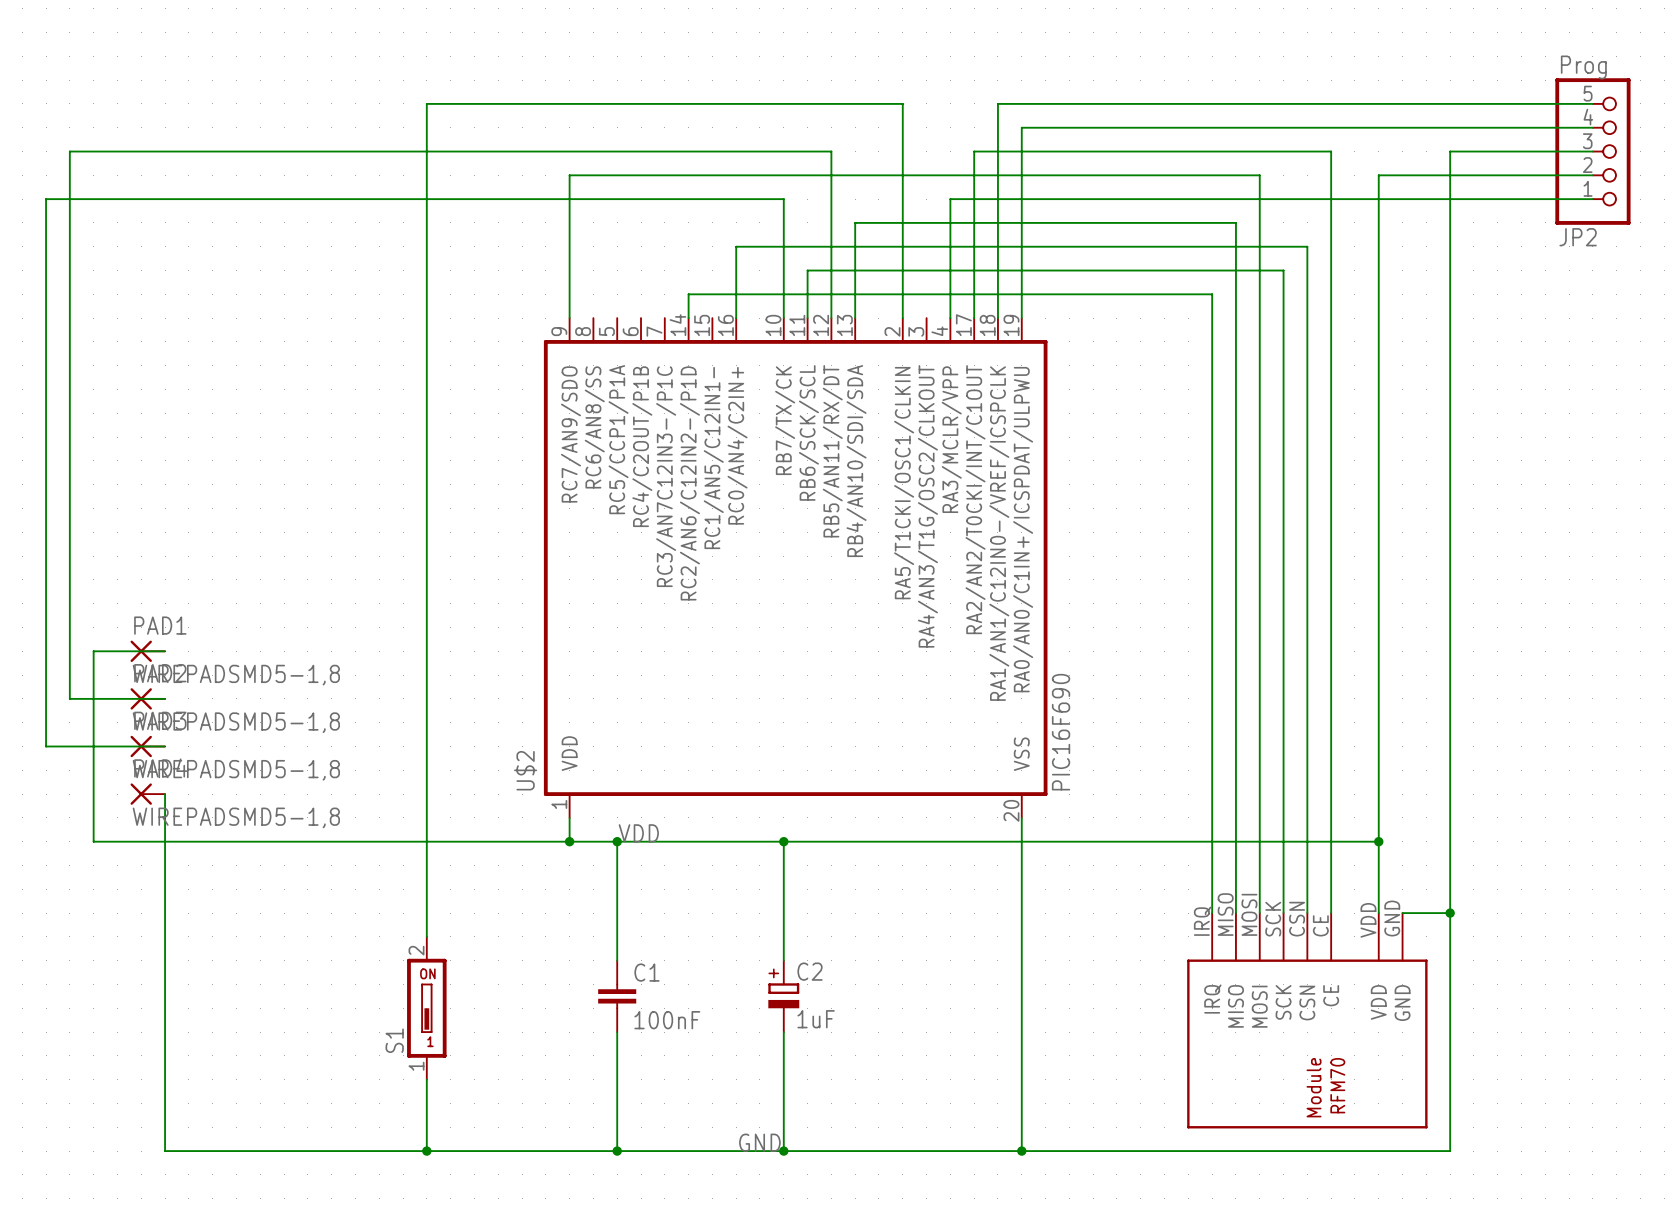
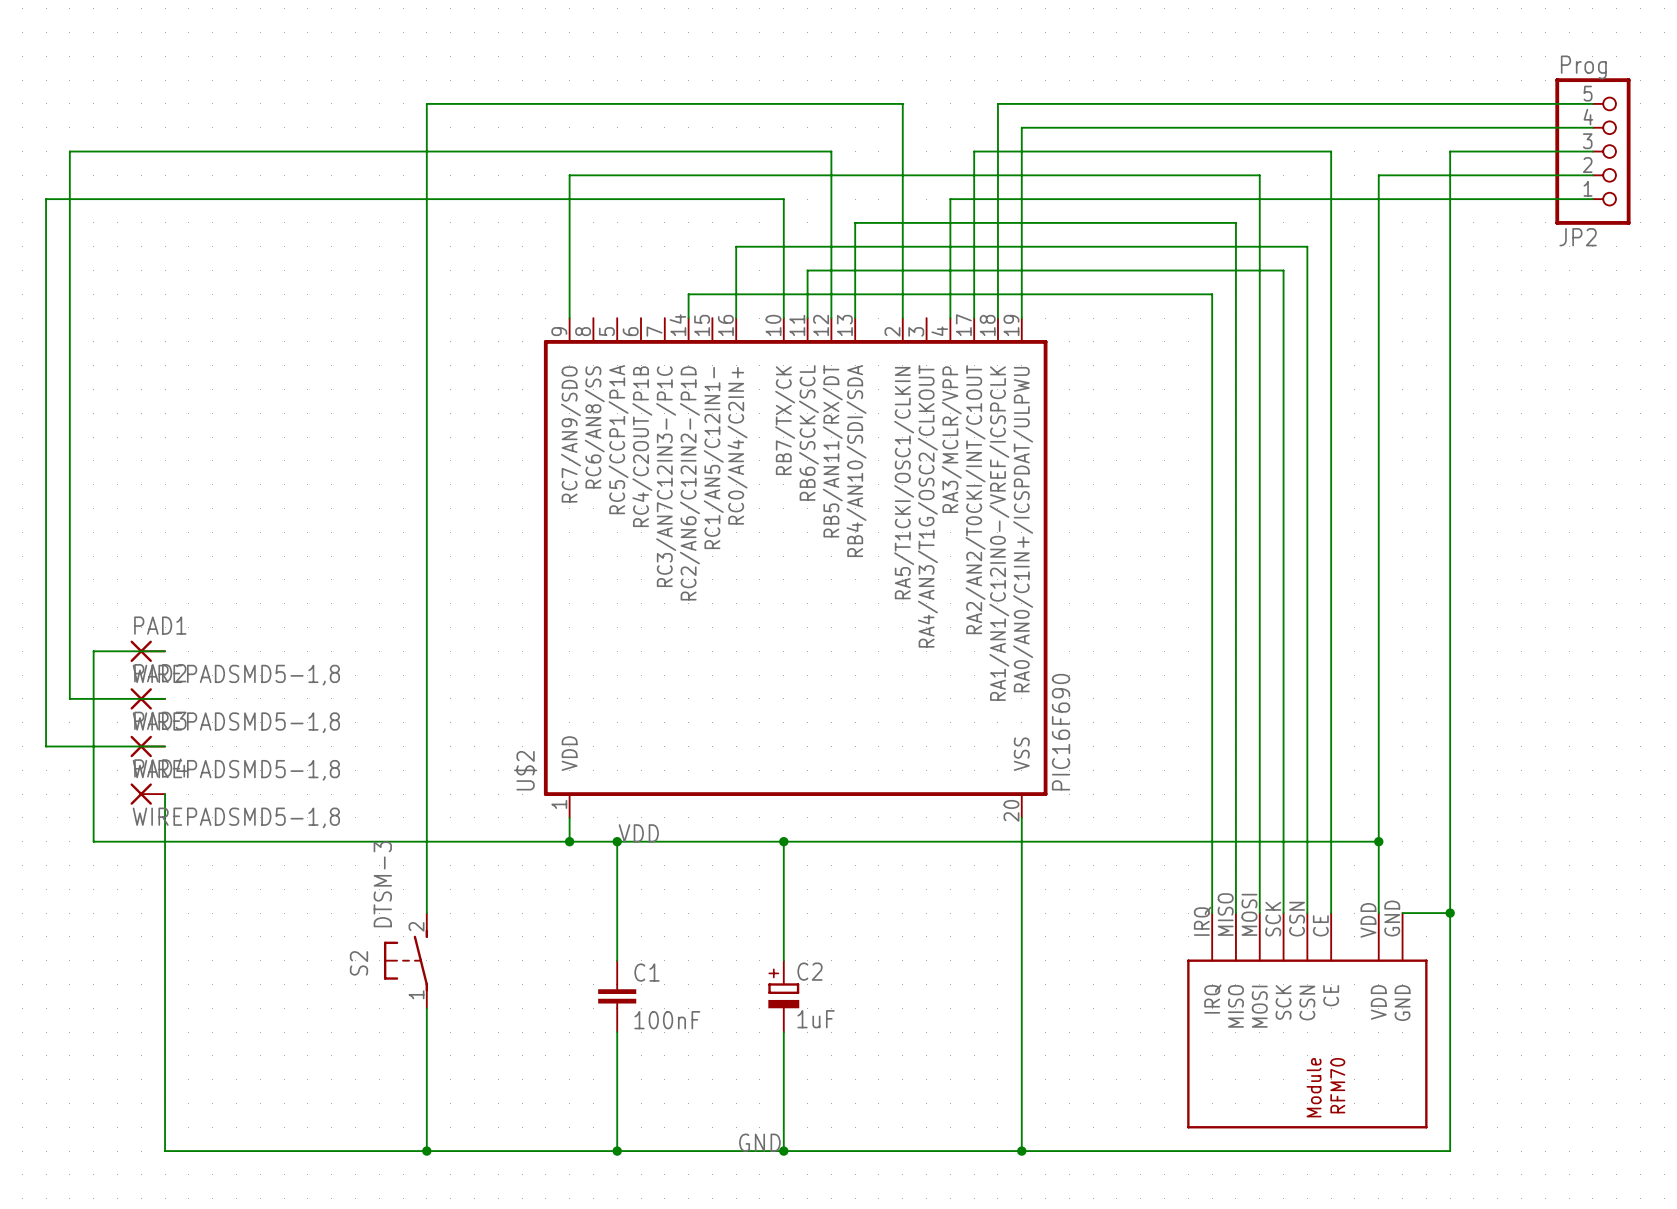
S2: none -> DTSM-3 (405, 960)
S1: (426, 1008) -> none

